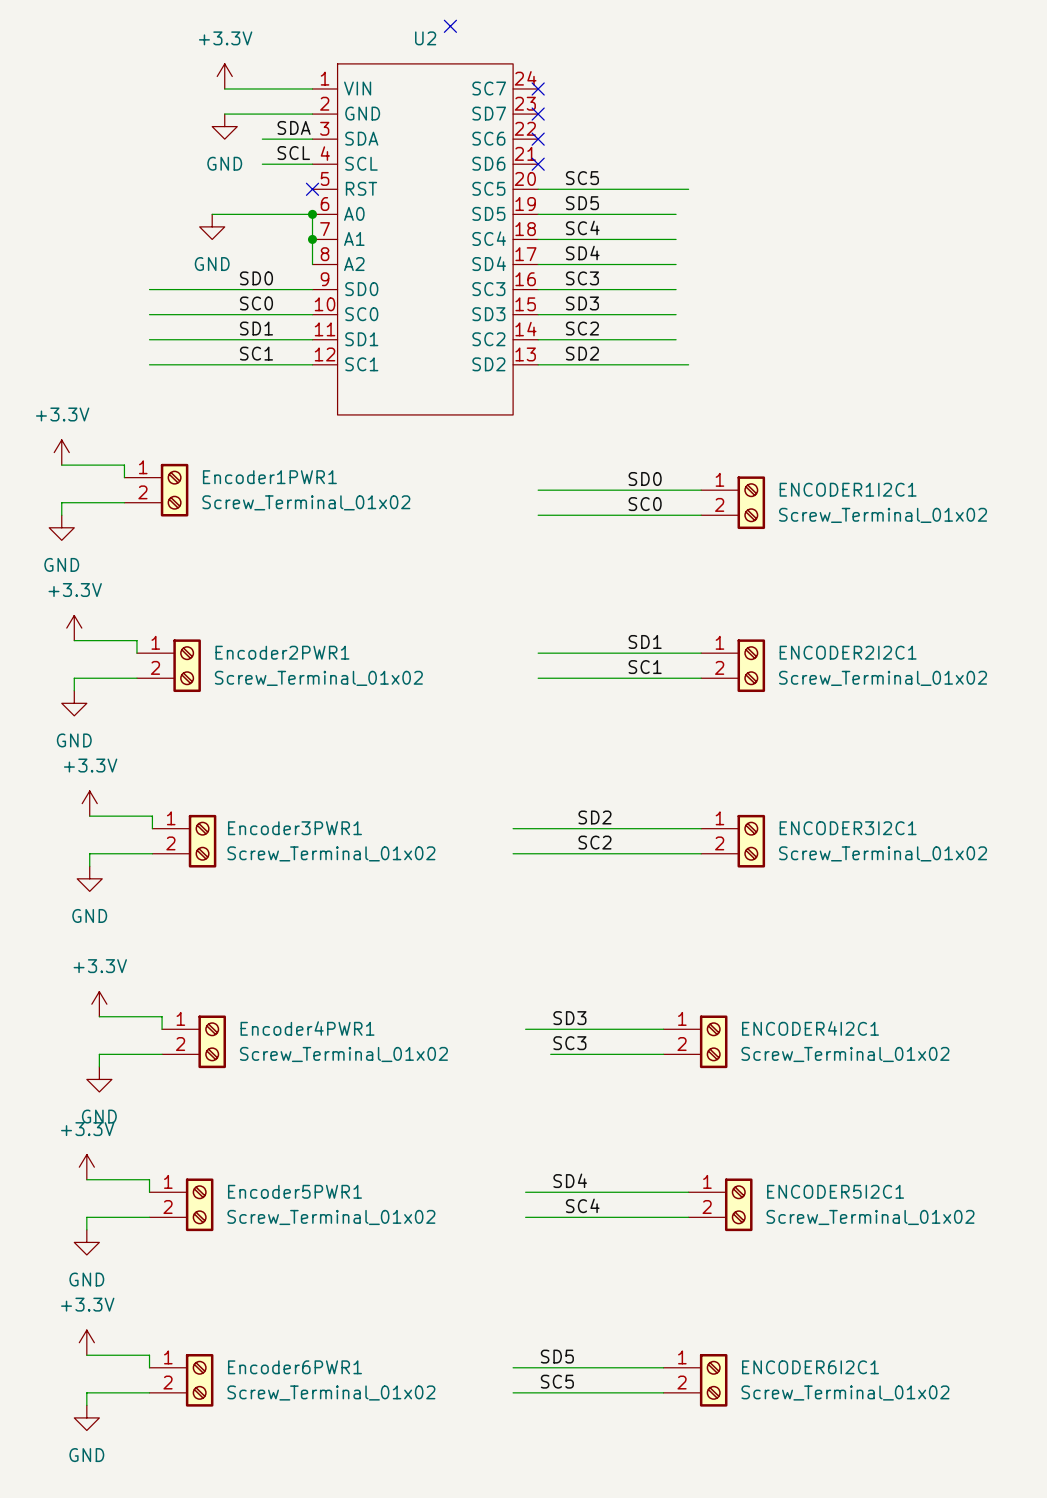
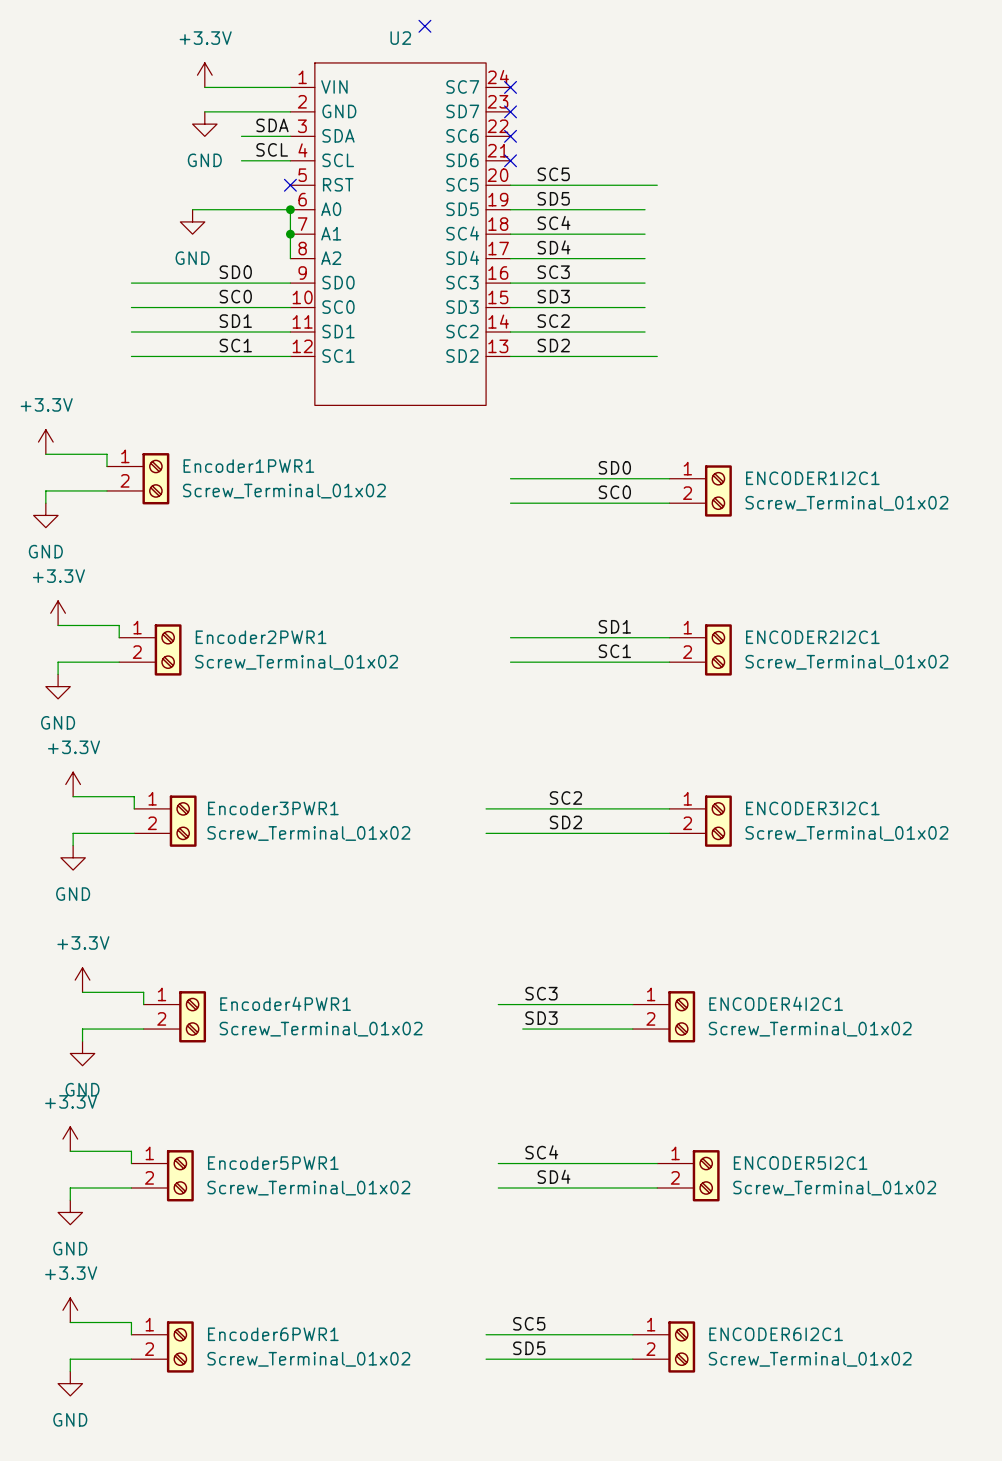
label: SD2 (594, 817) -> SC2 (565, 798)
label: SC2 (594, 842) -> SD2 (565, 822)
label: SD3 (569, 1018) -> SC3 (541, 993)
label: SC3 (569, 1043) -> SD3 (541, 1018)
label: SD4 (570, 1180) -> SC4 (541, 1152)
label: SC4 (582, 1205) -> SD4 (554, 1176)
label: SD5 (557, 1356) -> SC5 (529, 1323)
label: SC5 (557, 1381) -> SD5 (529, 1348)

